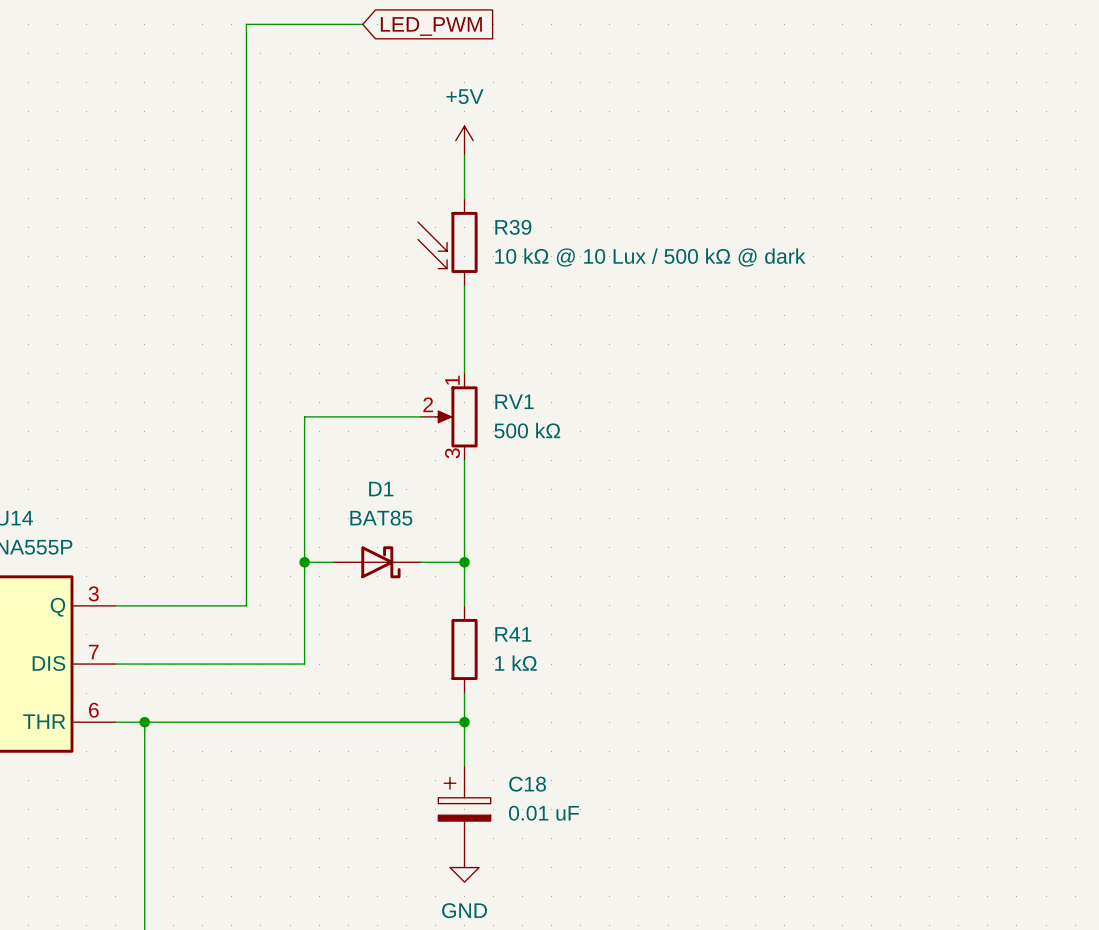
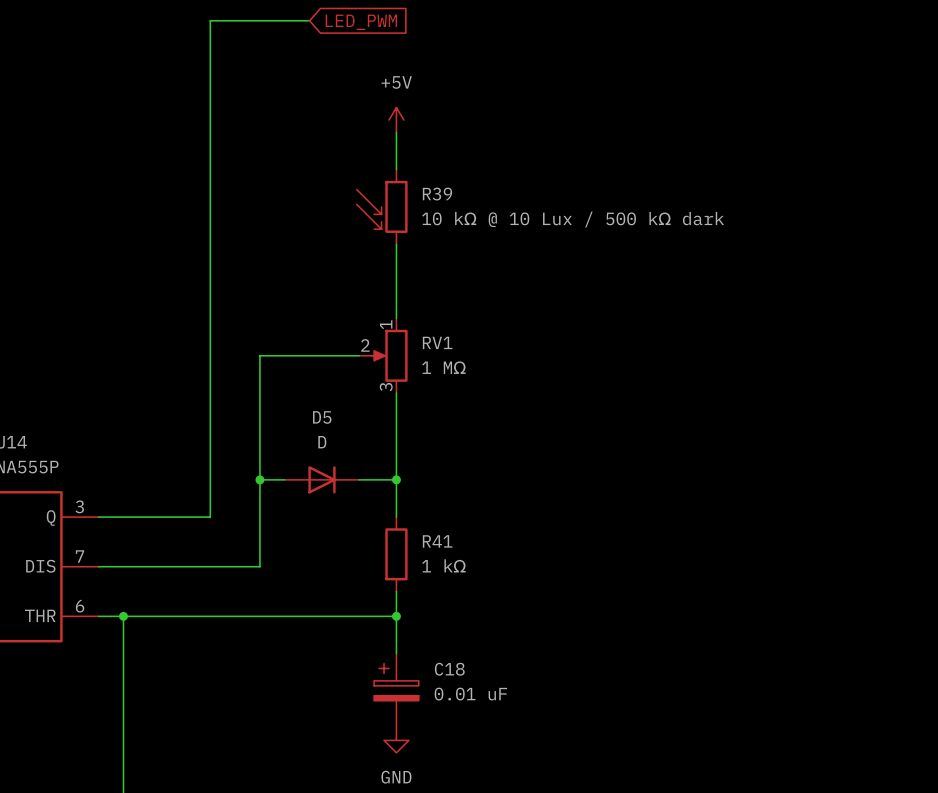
R39 value: 10 kΩ @ 10 Lux / 500 kΩ @ dark (650, 257) -> 10 kΩ @ 10 Lux / 500 kΩ dark (573, 219)
RV1 value: 500 kΩ (527, 430) -> 1 MΩ (443, 367)
D1: BAT85 (377, 562) -> none
D5: none -> D (322, 479)

